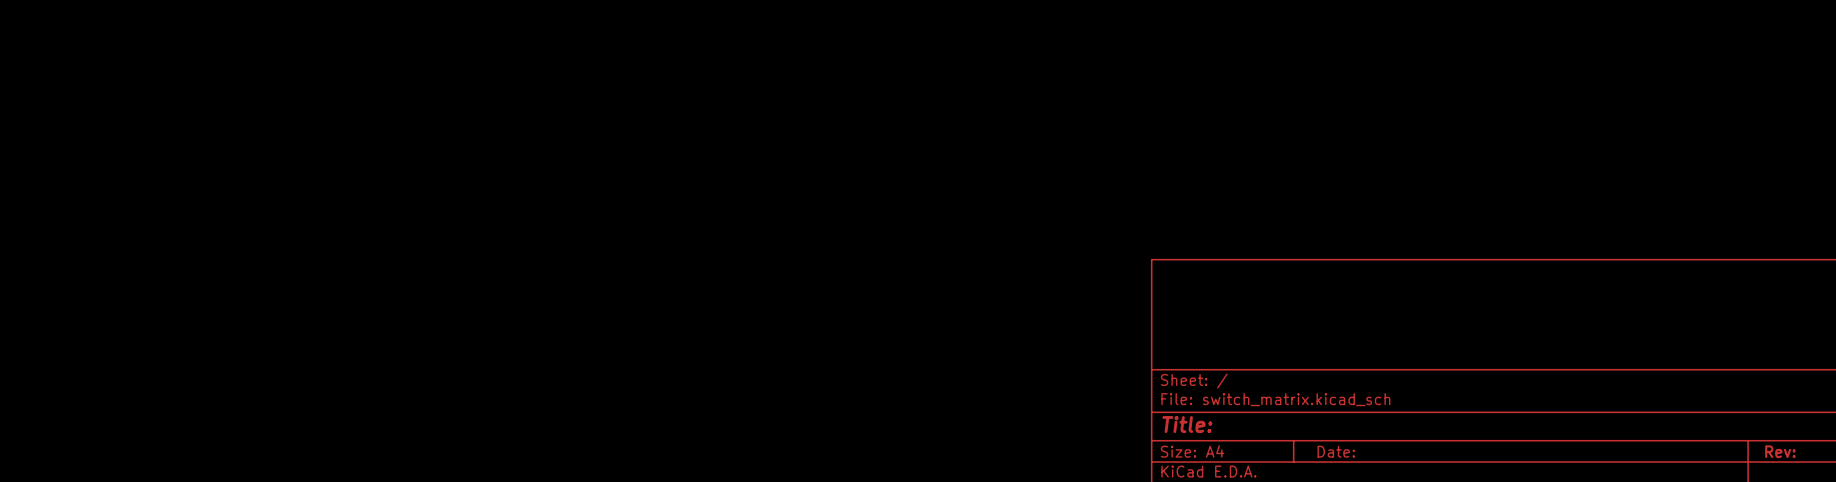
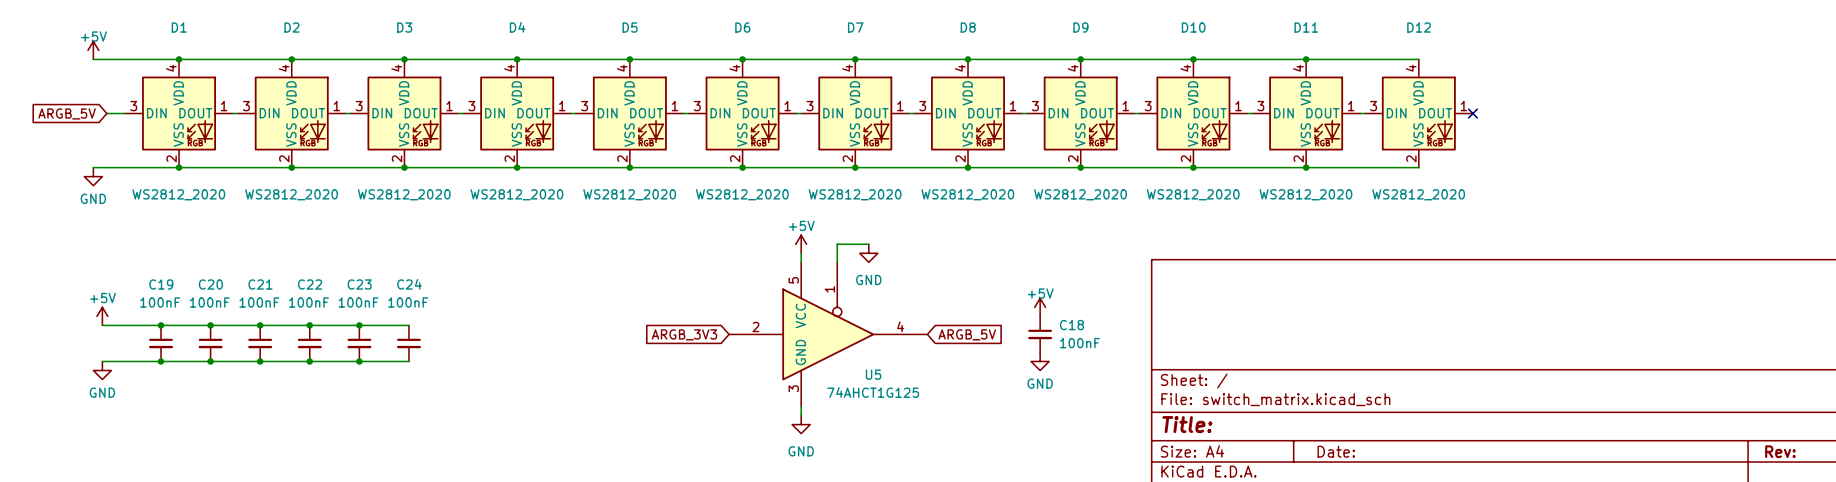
power symbol: none -> +5V (93, 50)
wire: none -> (93, 59) (1418, 59)
junction: none -> (179, 59)
junction: none -> (291, 59)
junction: none -> (404, 59)
junction: none -> (517, 59)
junction: none -> (629, 59)
junction: none -> (742, 59)
junction: none -> (855, 59)
junction: none -> (968, 59)
junction: none -> (1080, 59)
junction: none -> (1193, 59)
junction: none -> (1306, 59)
global label: none -> ARGB_5V (67, 113)
wire: none -> (106, 113) (124, 113)
D1: none -> WS2812_2020 (179, 113)
wire: none -> (233, 113) (237, 113)
D2: none -> WS2812_2020 (291, 113)
wire: none -> (345, 113) (350, 113)
D3: none -> WS2812_2020 (404, 113)
wire: none -> (458, 113) (463, 113)
D4: none -> WS2812_2020 (517, 113)
wire: none -> (571, 113) (575, 113)
D5: none -> WS2812_2020 (629, 113)
wire: none -> (683, 113) (688, 113)
D6: none -> WS2812_2020 (742, 113)
wire: none -> (796, 113) (801, 113)
D7: none -> WS2812_2020 (855, 113)
wire: none -> (909, 113) (913, 113)
D8: none -> WS2812_2020 (968, 113)
wire: none -> (1022, 113) (1026, 113)
D9: none -> WS2812_2020 (1080, 113)
wire: none -> (1134, 113) (1139, 113)
D10: none -> WS2812_2020 (1193, 113)
wire: none -> (1247, 113) (1252, 113)
D11: none -> WS2812_2020 (1306, 113)
wire: none -> (1360, 113) (1364, 113)
D12: none -> WS2812_2020 (1418, 113)
no-connect mark: none -> (1472, 113)
wire: none -> (93, 167) (1418, 167)
junction: none -> (179, 167)
junction: none -> (291, 167)
junction: none -> (404, 167)
junction: none -> (517, 167)
junction: none -> (629, 167)
junction: none -> (742, 167)
junction: none -> (855, 167)
junction: none -> (968, 167)
junction: none -> (1080, 167)
junction: none -> (1193, 167)
junction: none -> (1306, 167)
power symbol: none -> GND (93, 176)
power symbol: none -> +5V (801, 244)
wire: none -> (868, 244) (837, 244) (837, 262)
wire: none -> (801, 253) (801, 262)
power symbol: none -> GND (868, 253)
power symbol: none -> +5V (1040, 307)
power symbol: none -> +5V (102, 316)
wire: none -> (102, 325) (408, 325)
junction: none -> (160, 325)
junction: none -> (210, 325)
junction: none -> (260, 325)
junction: none -> (309, 325)
junction: none -> (359, 325)
global label: none -> ARGB_3V3 (684, 334)
U5: none -> 74AHCT1G125 (828, 334)
global label: none -> ARGB_5V (967, 334)
C18: none -> 100nF (1040, 334)
C19: none -> 100nF (160, 343)
C20: none -> 100nF (210, 343)
C21: none -> 100nF (260, 343)
C22: none -> 100nF (309, 343)
C23: none -> 100nF (359, 343)
C24: none -> 100nF (408, 343)
wire: none -> (102, 361) (408, 361)
junction: none -> (160, 361)
junction: none -> (210, 361)
junction: none -> (260, 361)
junction: none -> (309, 361)
junction: none -> (359, 361)
power symbol: none -> GND (1040, 361)
power symbol: none -> GND (102, 370)
wire: none -> (801, 406) (801, 415)
power symbol: none -> GND (801, 424)

